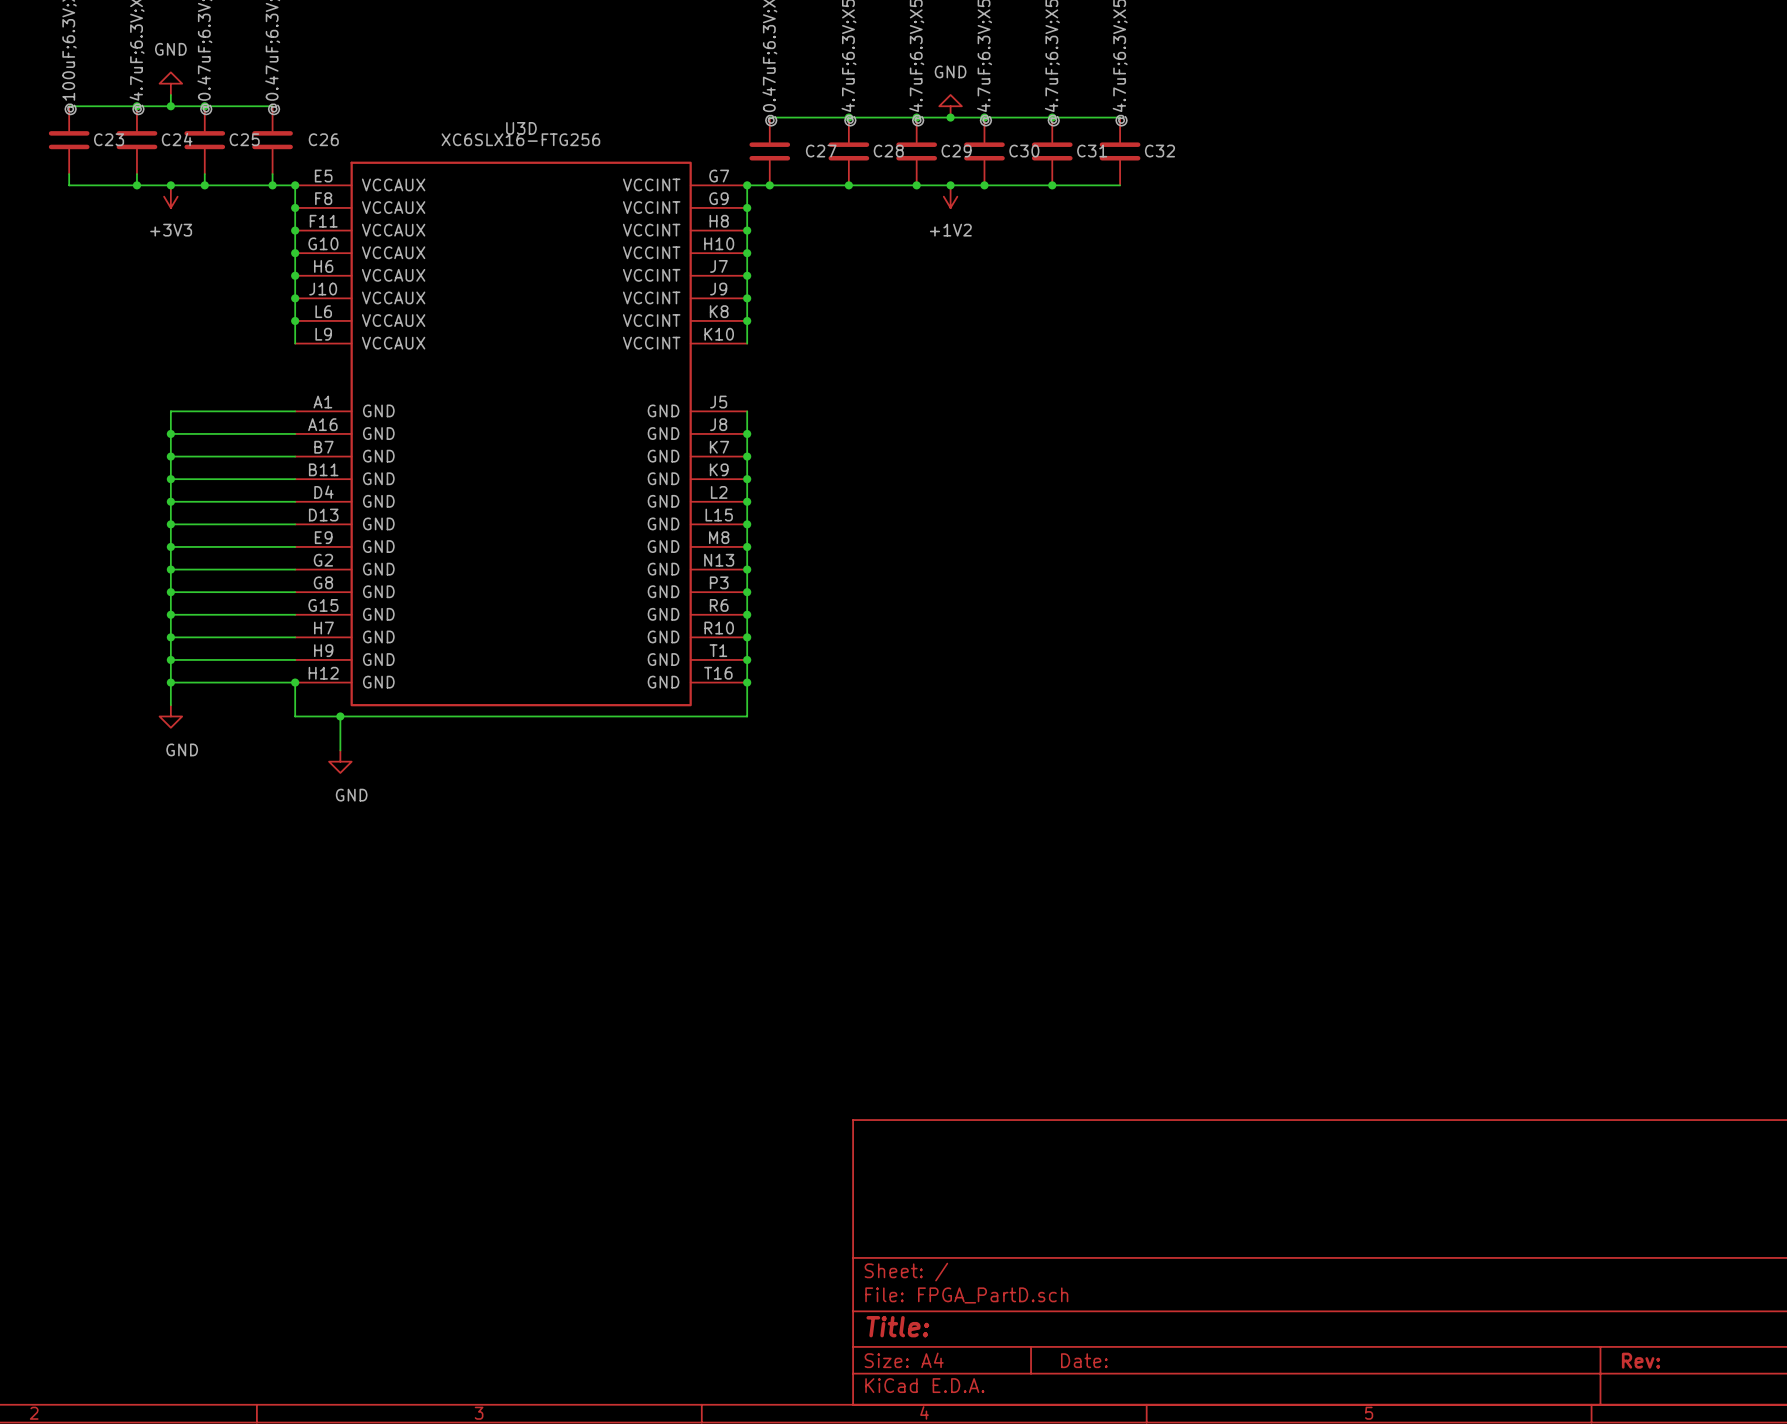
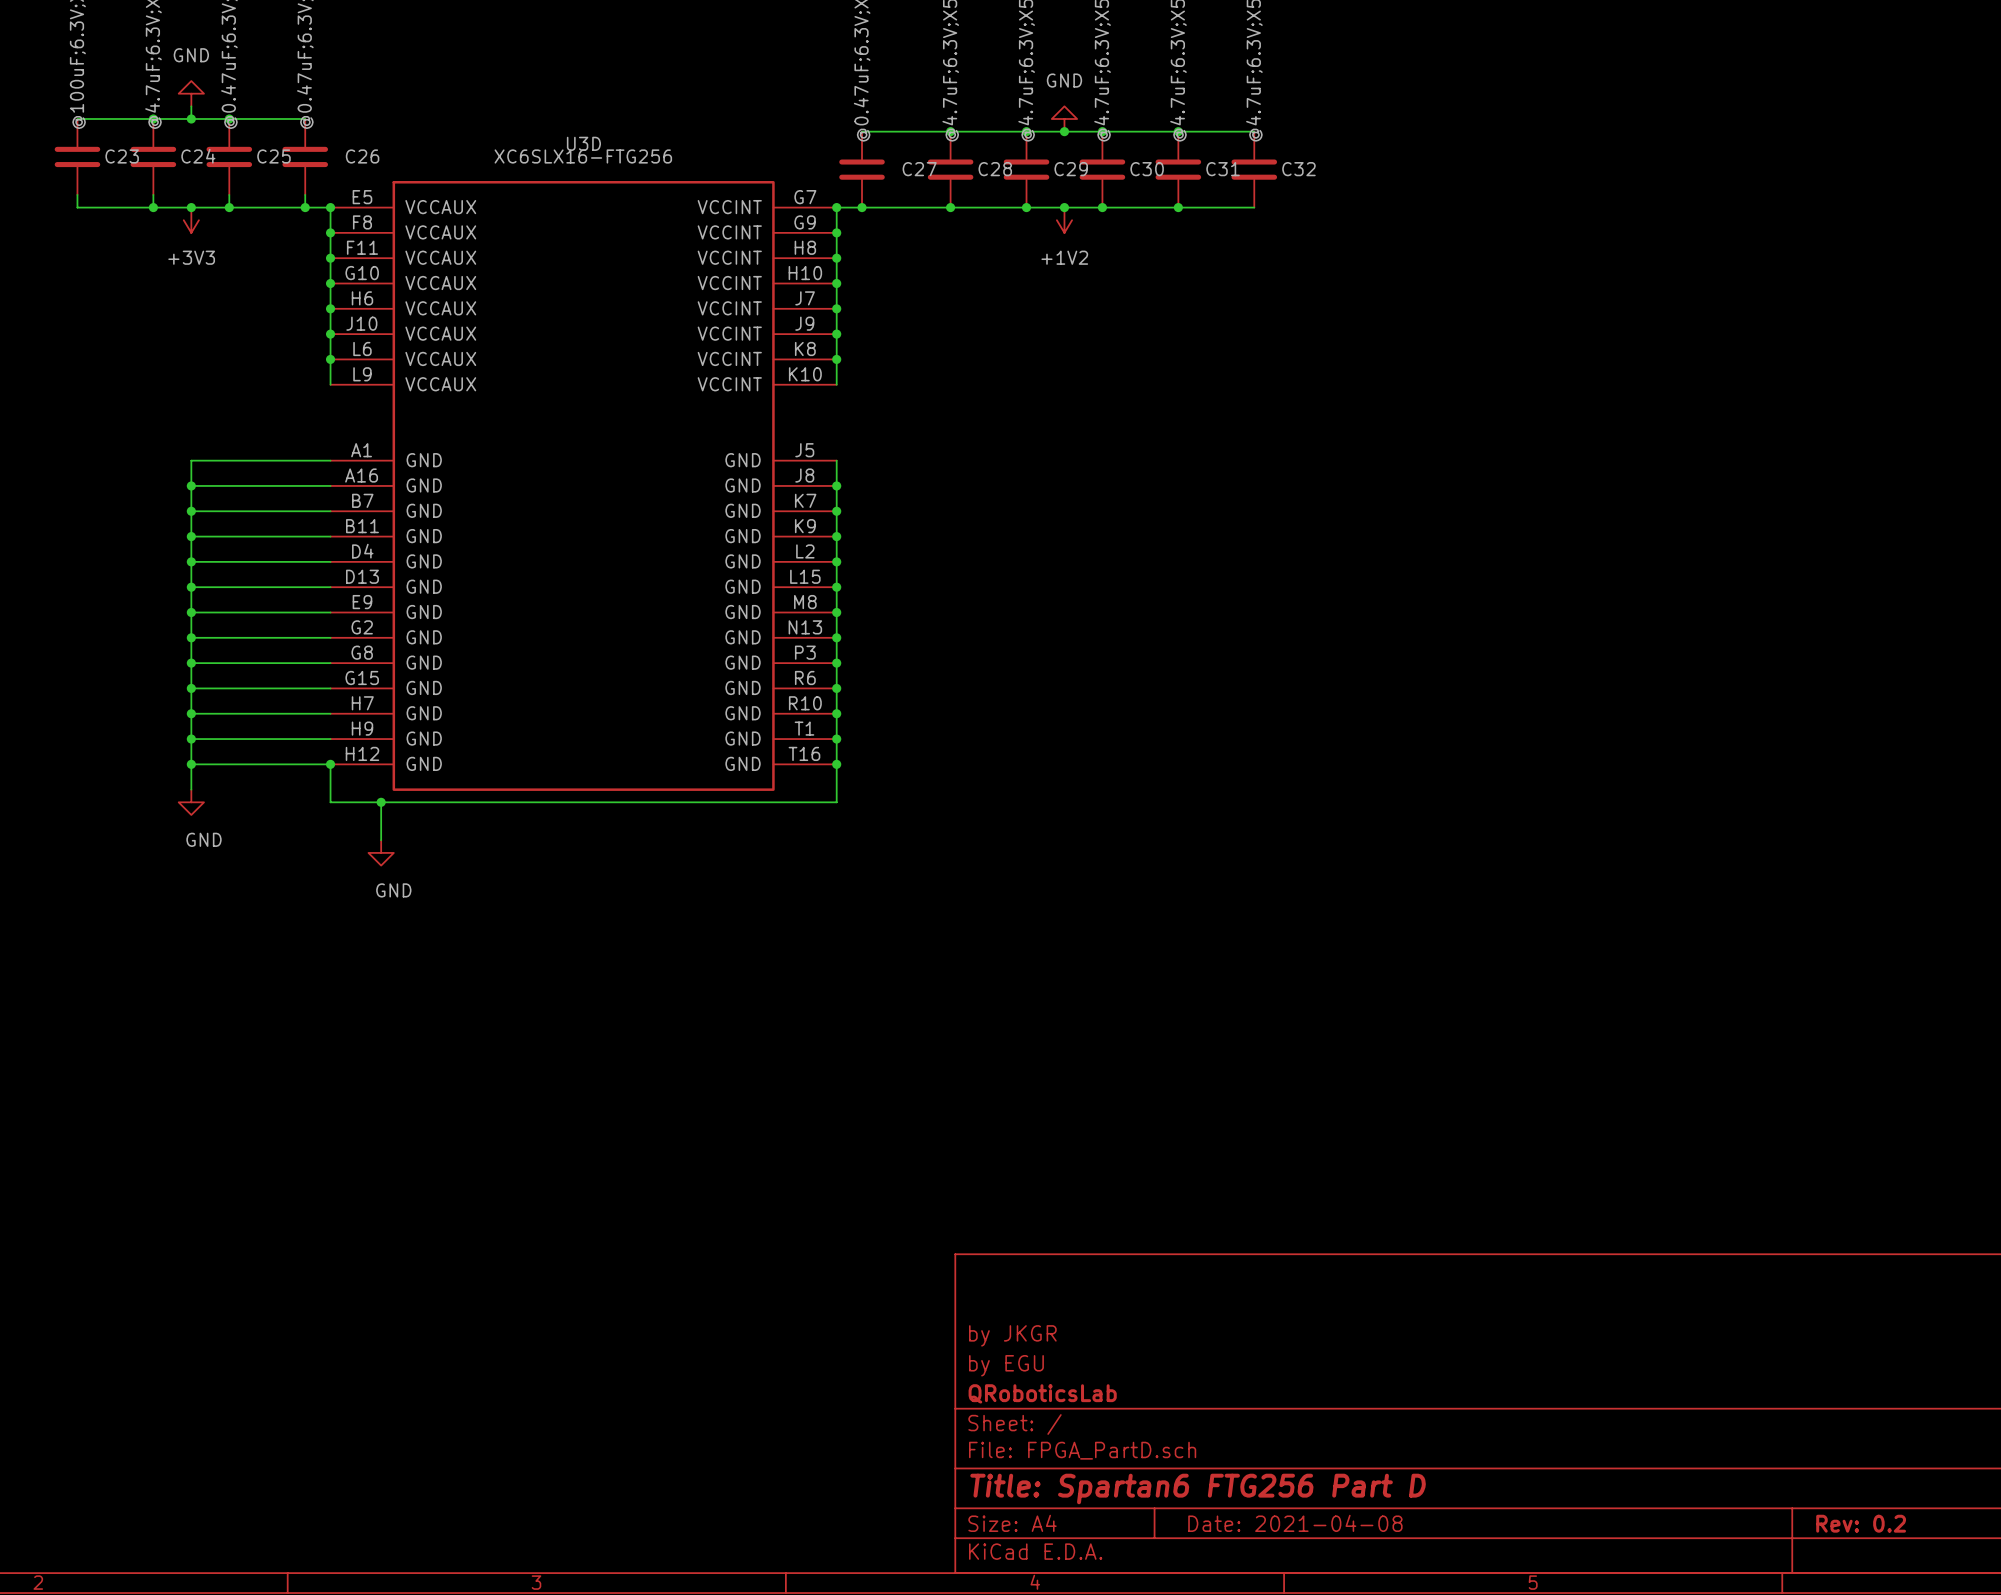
title block: none -> by JKGR (1012, 1335)
title block: none -> by EGU (1006, 1365)
title block: none -> QRoboticsLab (1042, 1393)
title block: Title: (897, 1326) -> Title: Spartan6 FTG256 Part D (1198, 1488)
title block: Date: (1084, 1360) -> Date: 2021-04-08 (1295, 1523)
title block: Rev: (1641, 1360) -> Rev: 0.2 (1861, 1523)

